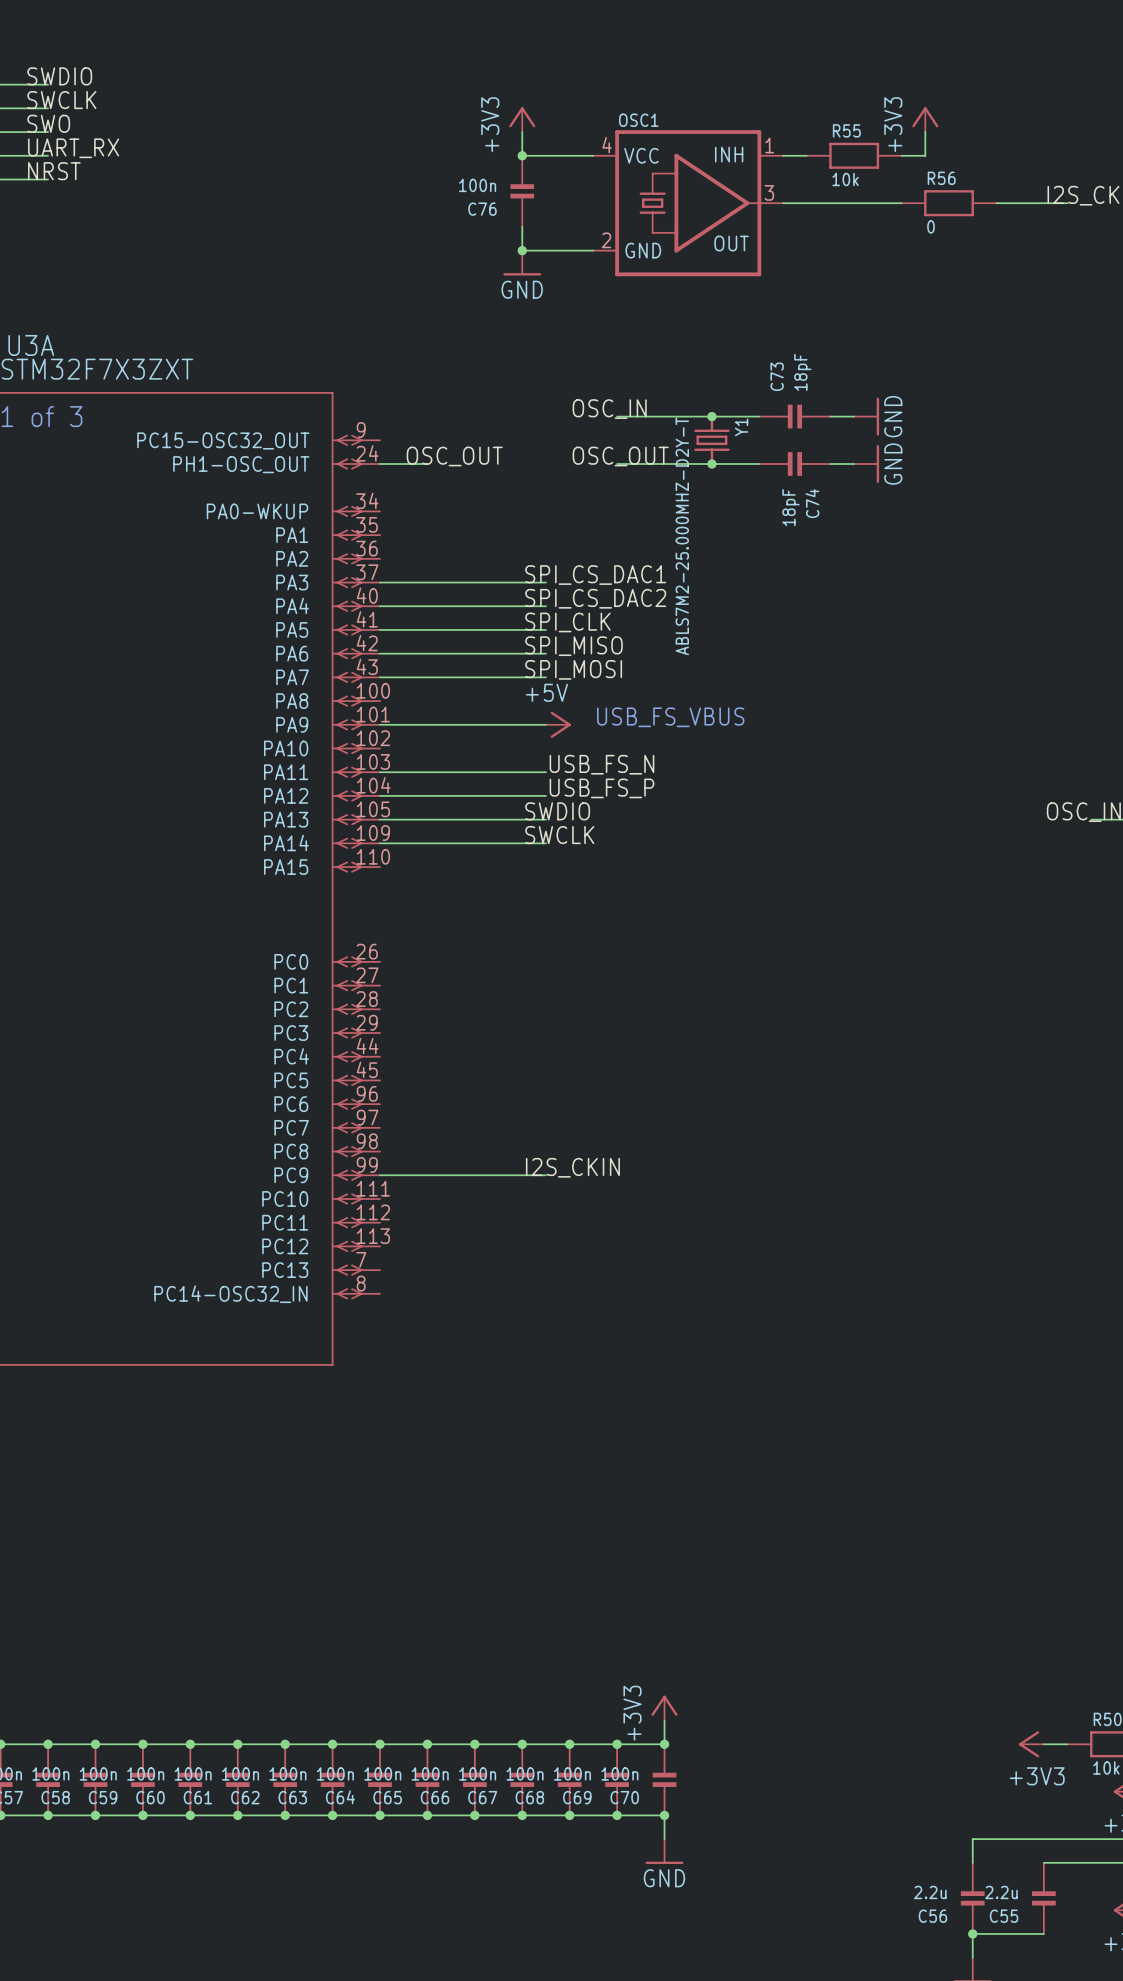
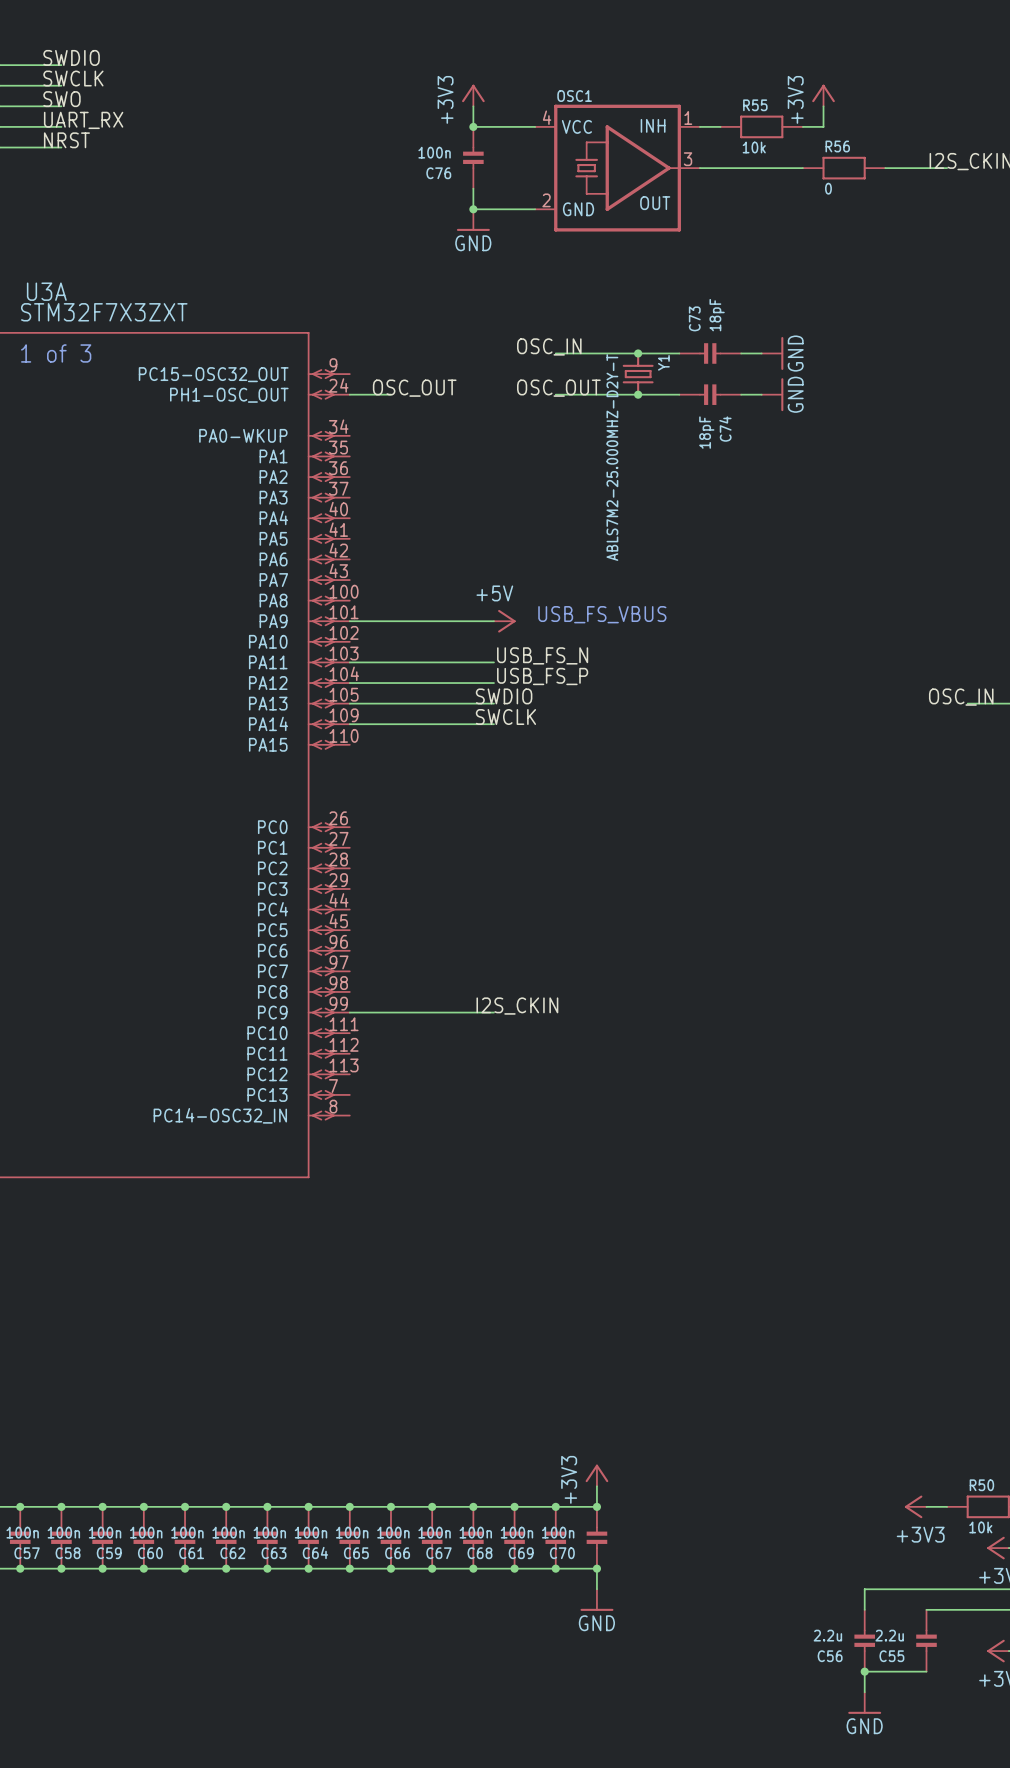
label: SPI_CS_DAC1 (595, 575) -> none
wire: (380, 582) (545, 582) -> none
label: SPI_CS_DAC2 (595, 598) -> none
wire: (380, 606) (545, 606) -> none
label: SPI_CLK (567, 622) -> none
wire: (380, 629) (545, 629) -> none
label: SPI_MISO (573, 646) -> none
wire: (380, 653) (545, 653) -> none
label: SPI_MOSI (573, 669) -> none
wire: (380, 677) (545, 677) -> none

